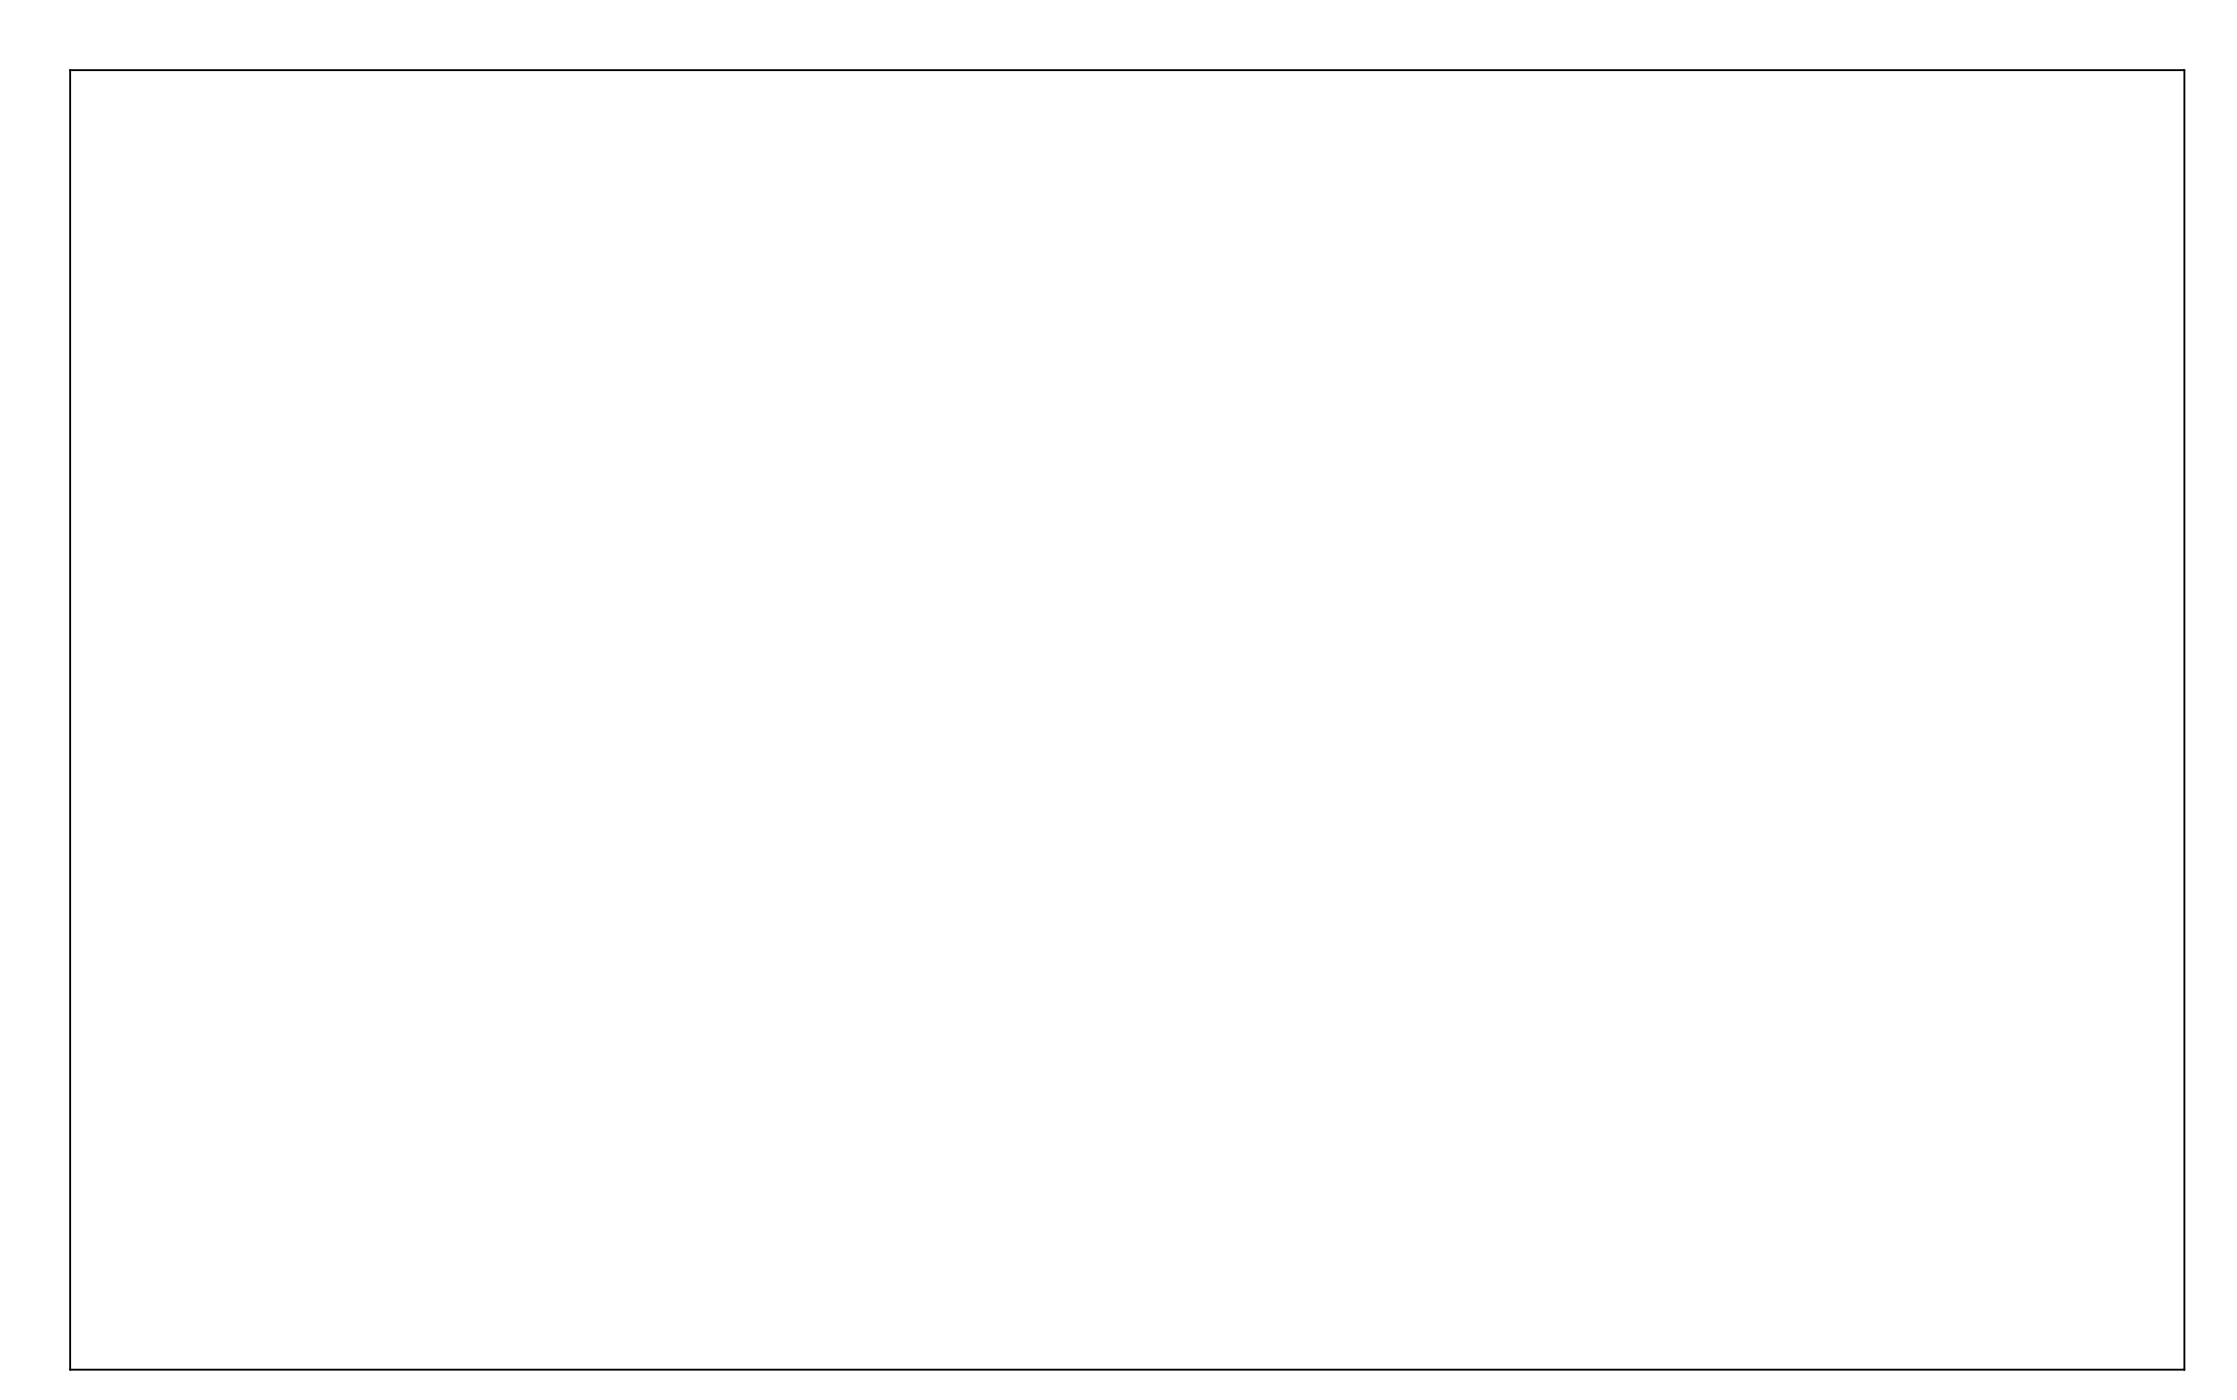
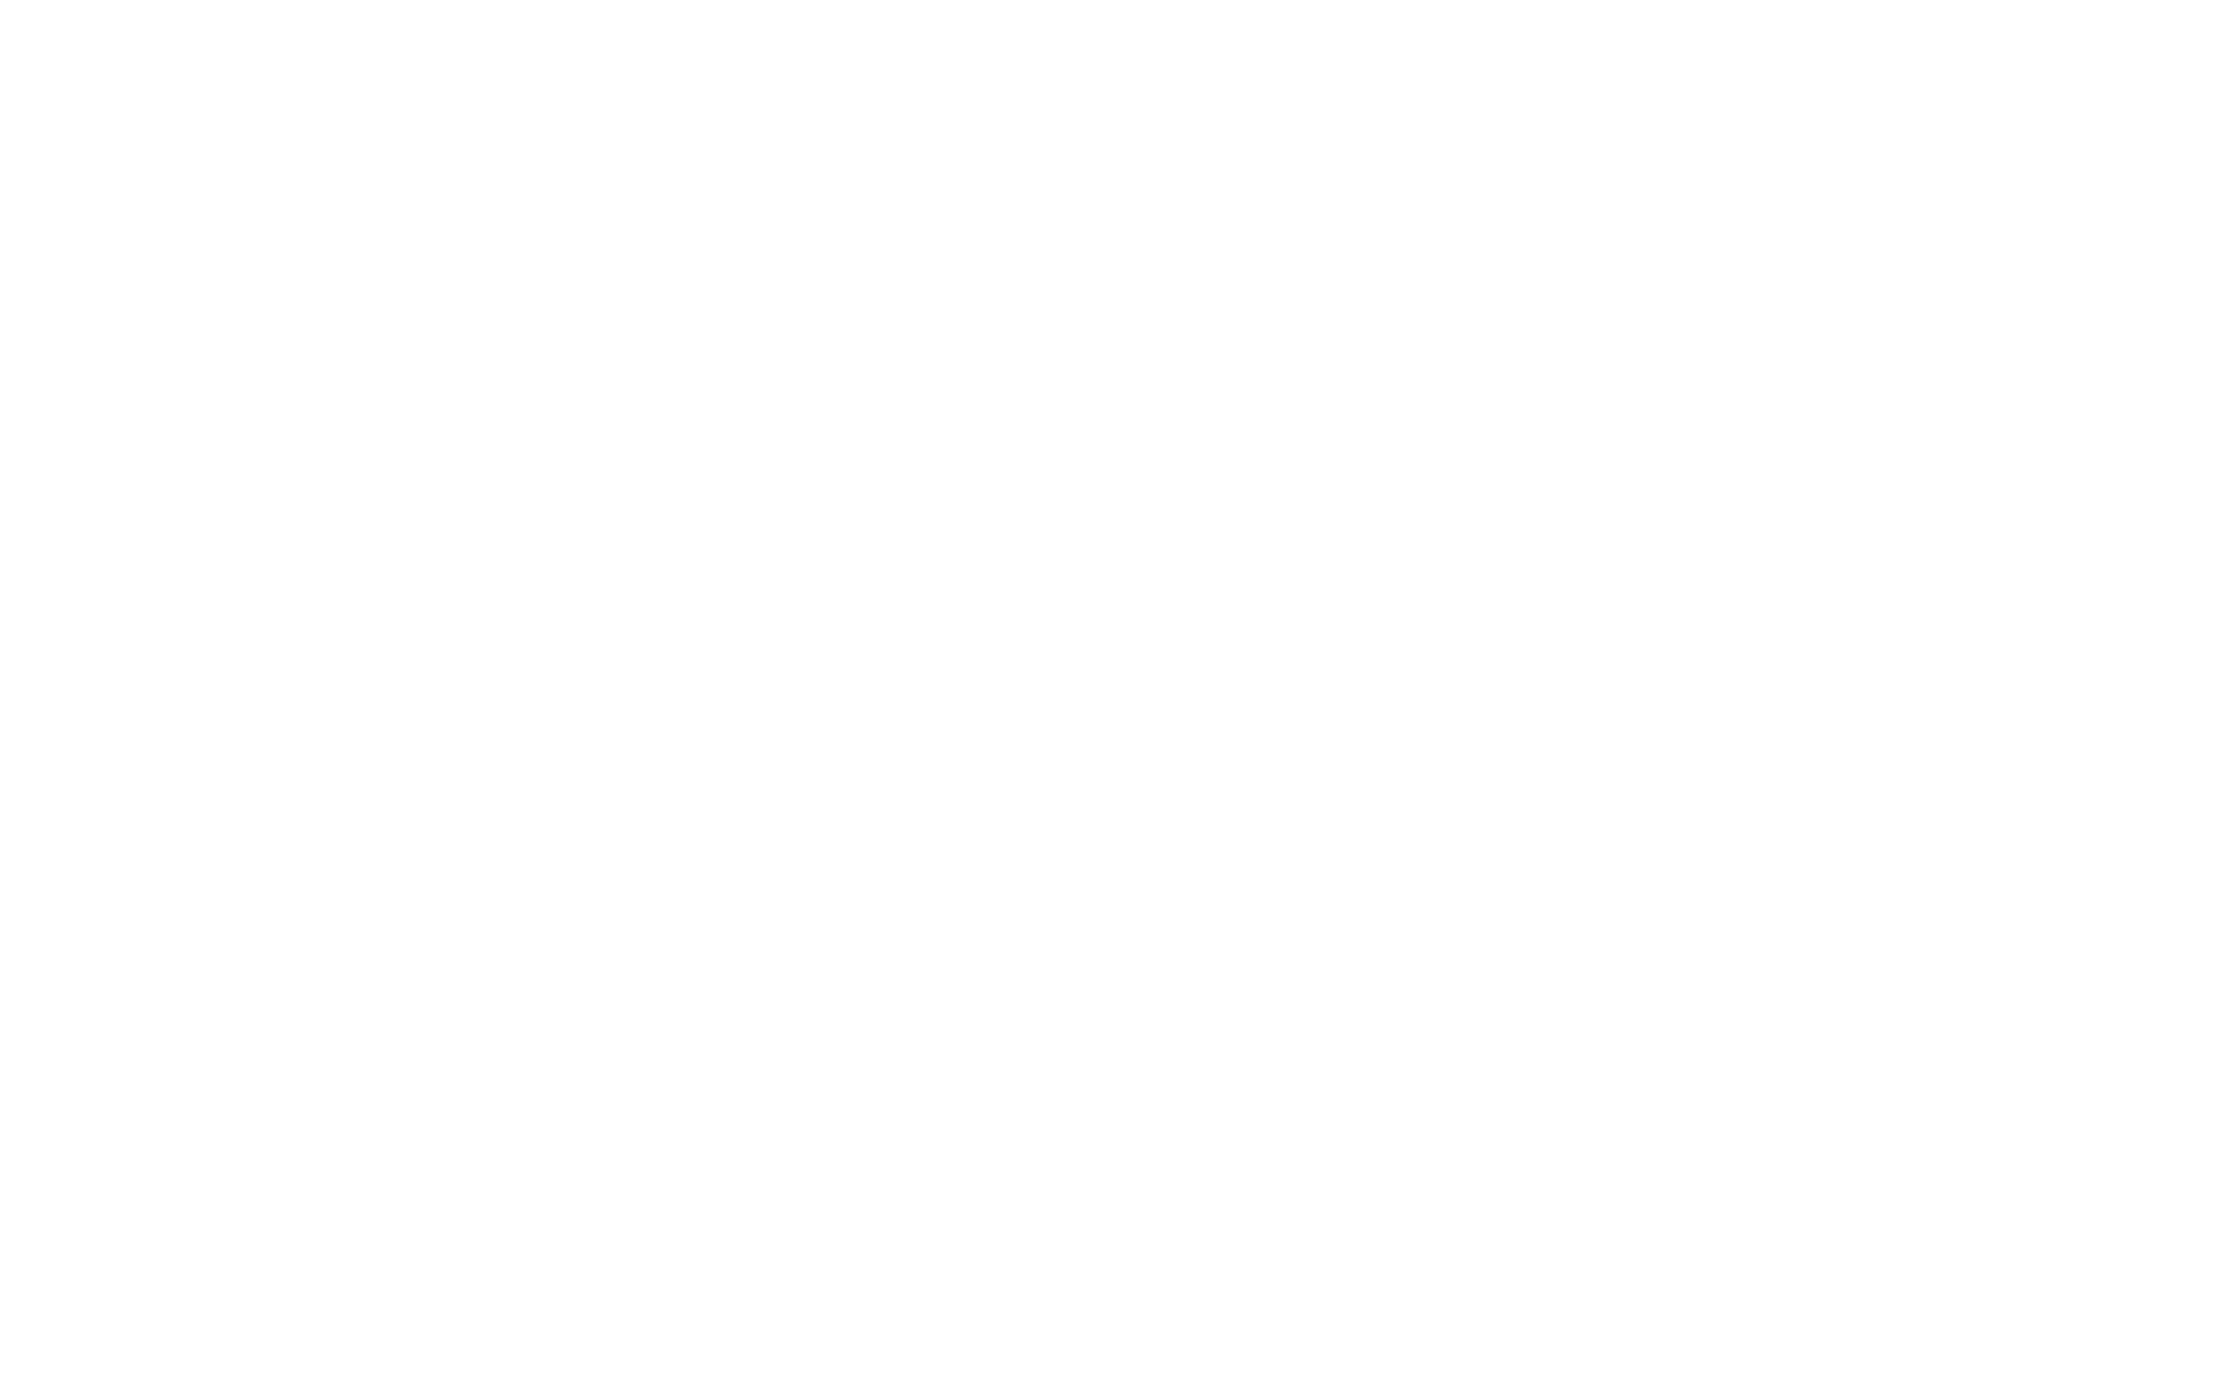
board edge: (70, 70) (2184, 70) (2184, 1369) (70, 1369) (70, 70) -> none

